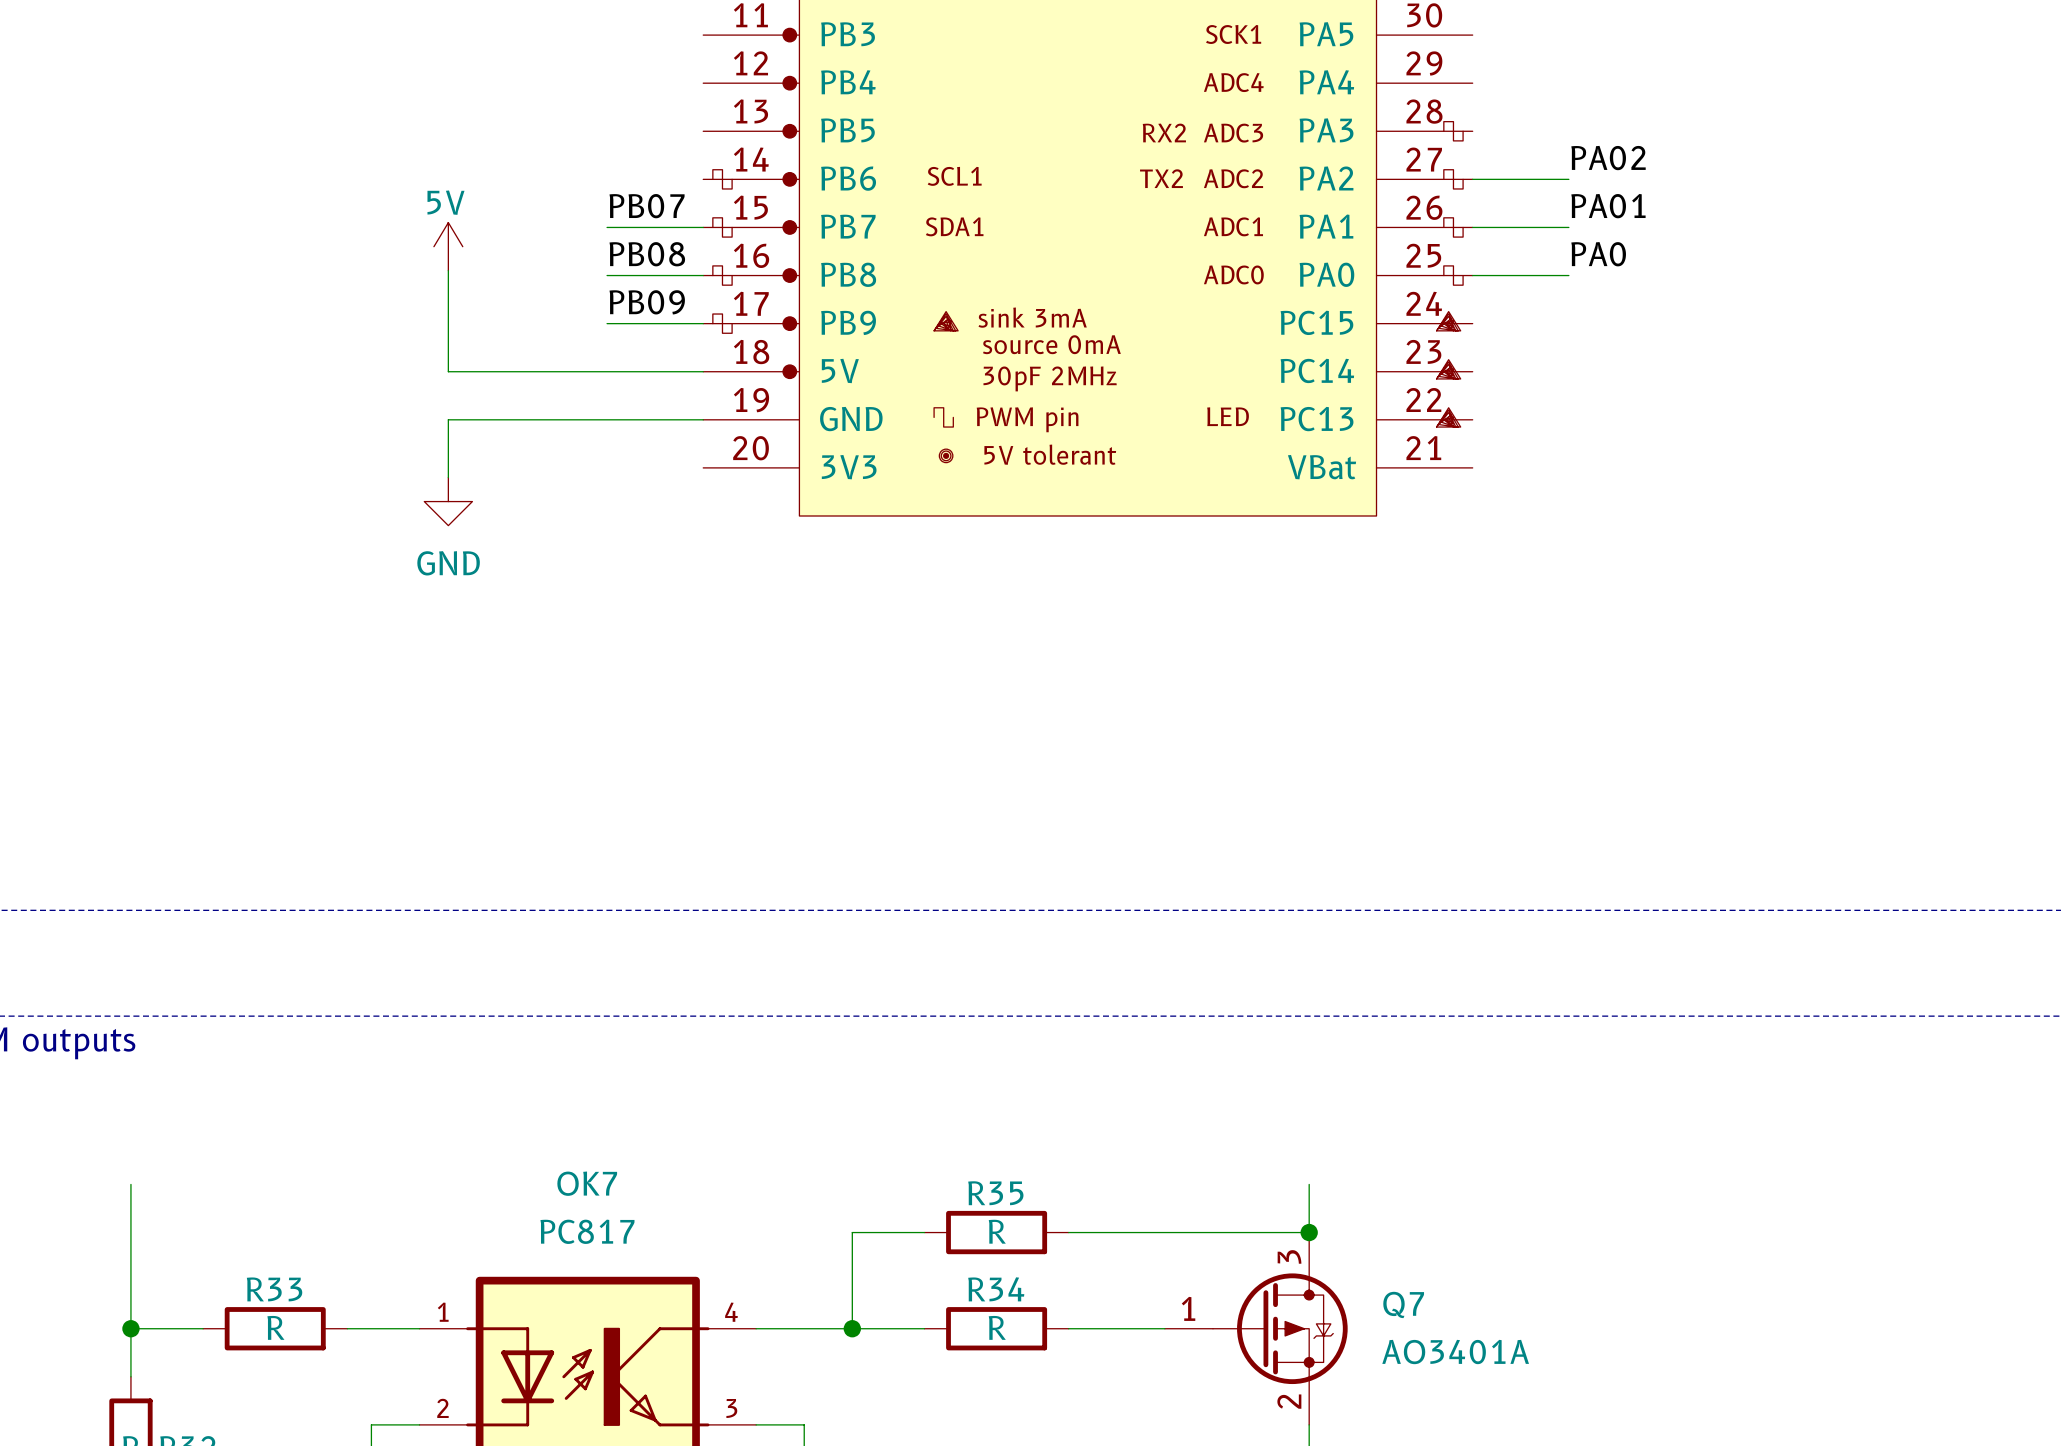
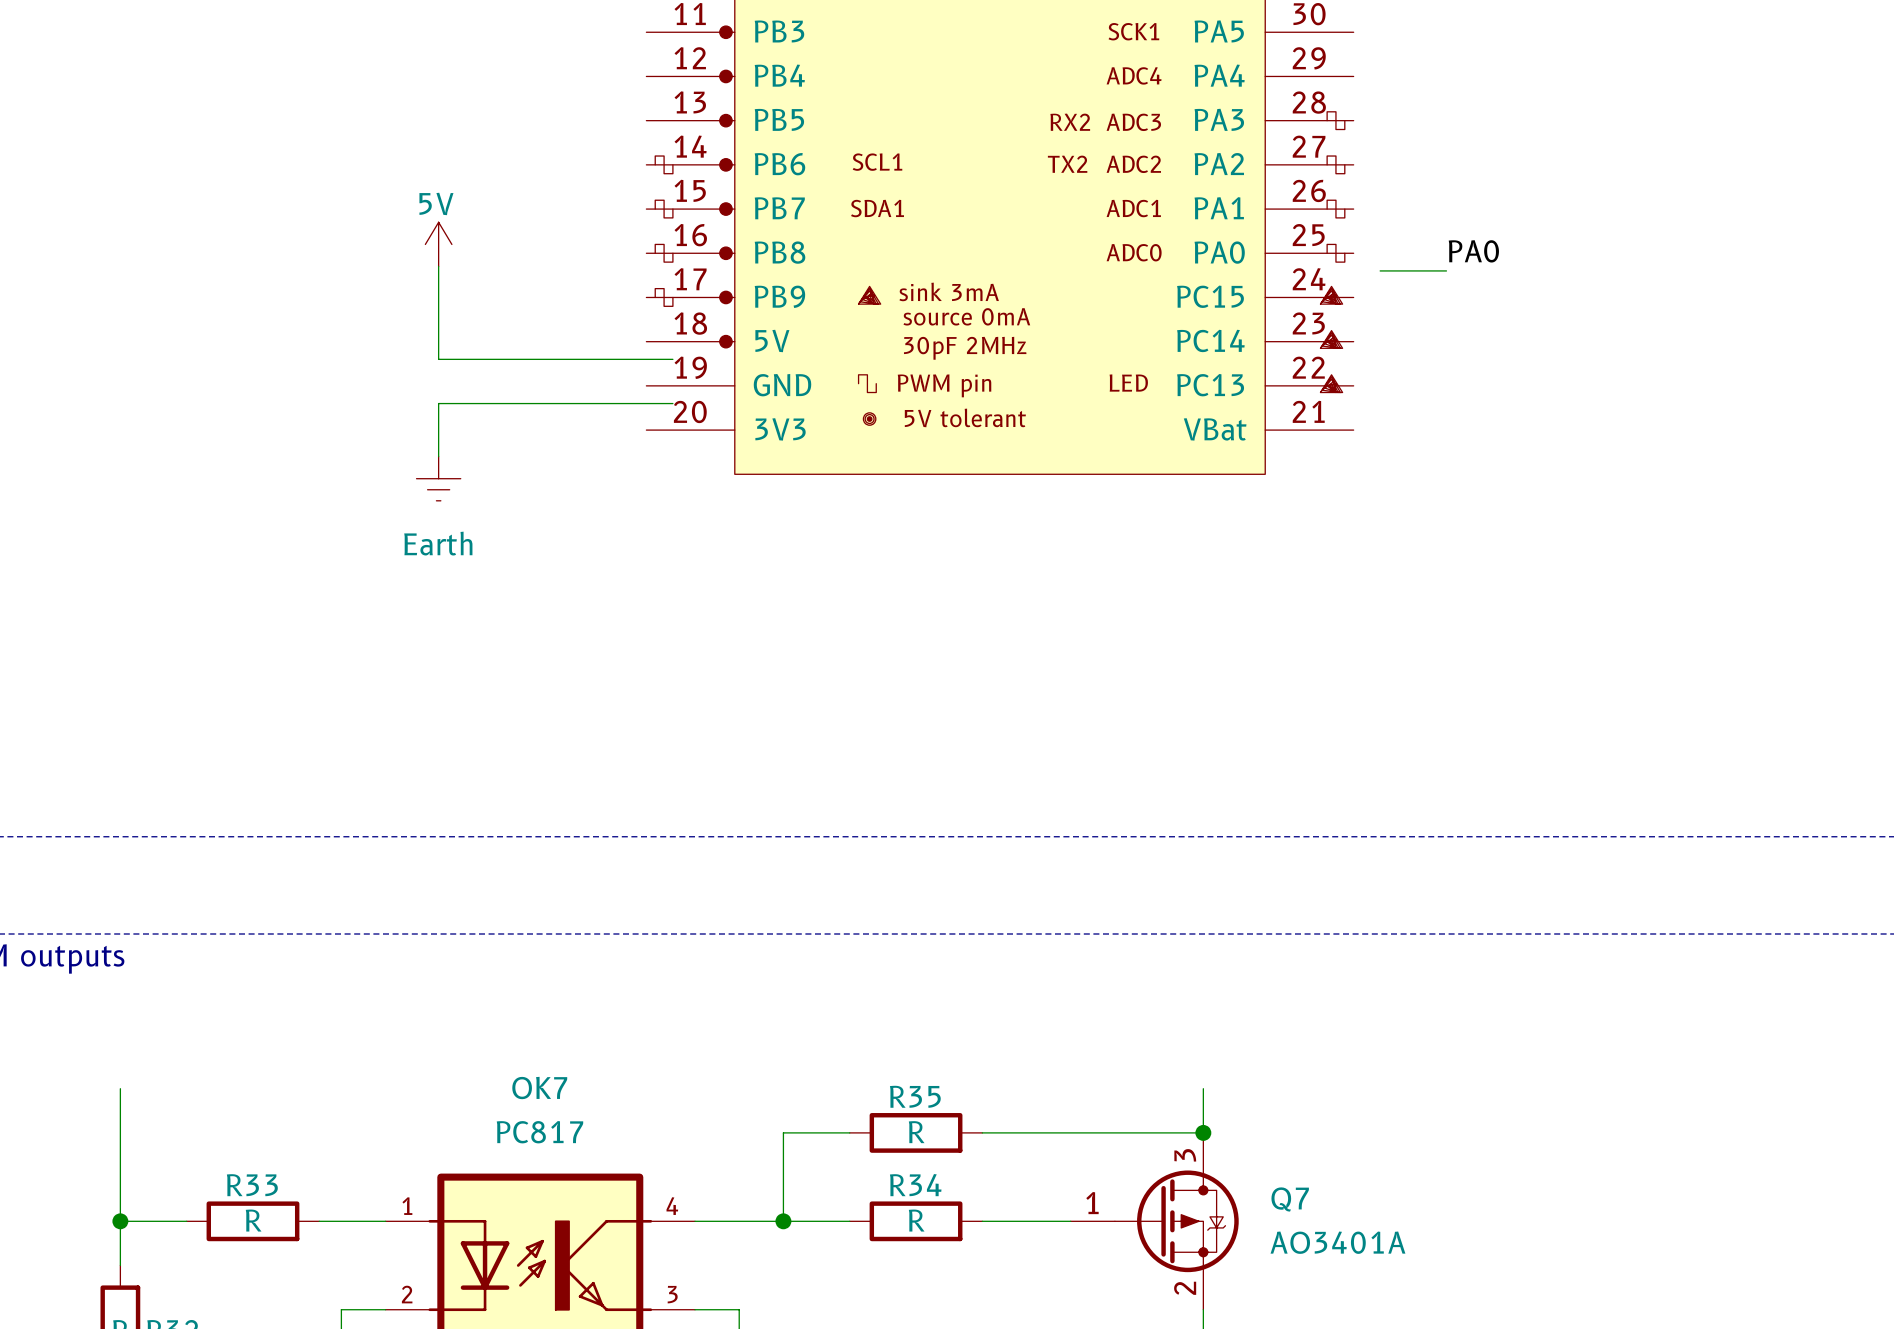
label: PA02 (1608, 158) -> none
wire: (1472, 179) (1568, 179) -> none
label: PB07 (647, 206) -> none
label: PA01 (1608, 206) -> none
wire: (607, 227) (703, 227) -> none
wire: (1472, 227) (1568, 227) -> none
power symbol position: 5V (448, 246) -> 5V (438, 244)
label: PB08 (647, 254) -> none
label position: PA0 (1598, 254) -> PA0 (1473, 251)
wire: (448, 270) (448, 371) (703, 371) -> (438, 266) (438, 359) (672, 359)
wire: (607, 275) (703, 275) -> none
wire: (1472, 275) (1568, 275) -> none
wire: none -> (1380, 270) (1446, 270)
label: PB09 (647, 302) -> none
wire: (607, 323) (703, 323) -> none
wire: (703, 419) (448, 419) (448, 477) -> (672, 403) (438, 403) (438, 456)
power symbol: GND (448, 501) -> none
power symbol: none -> Earth (438, 478)

